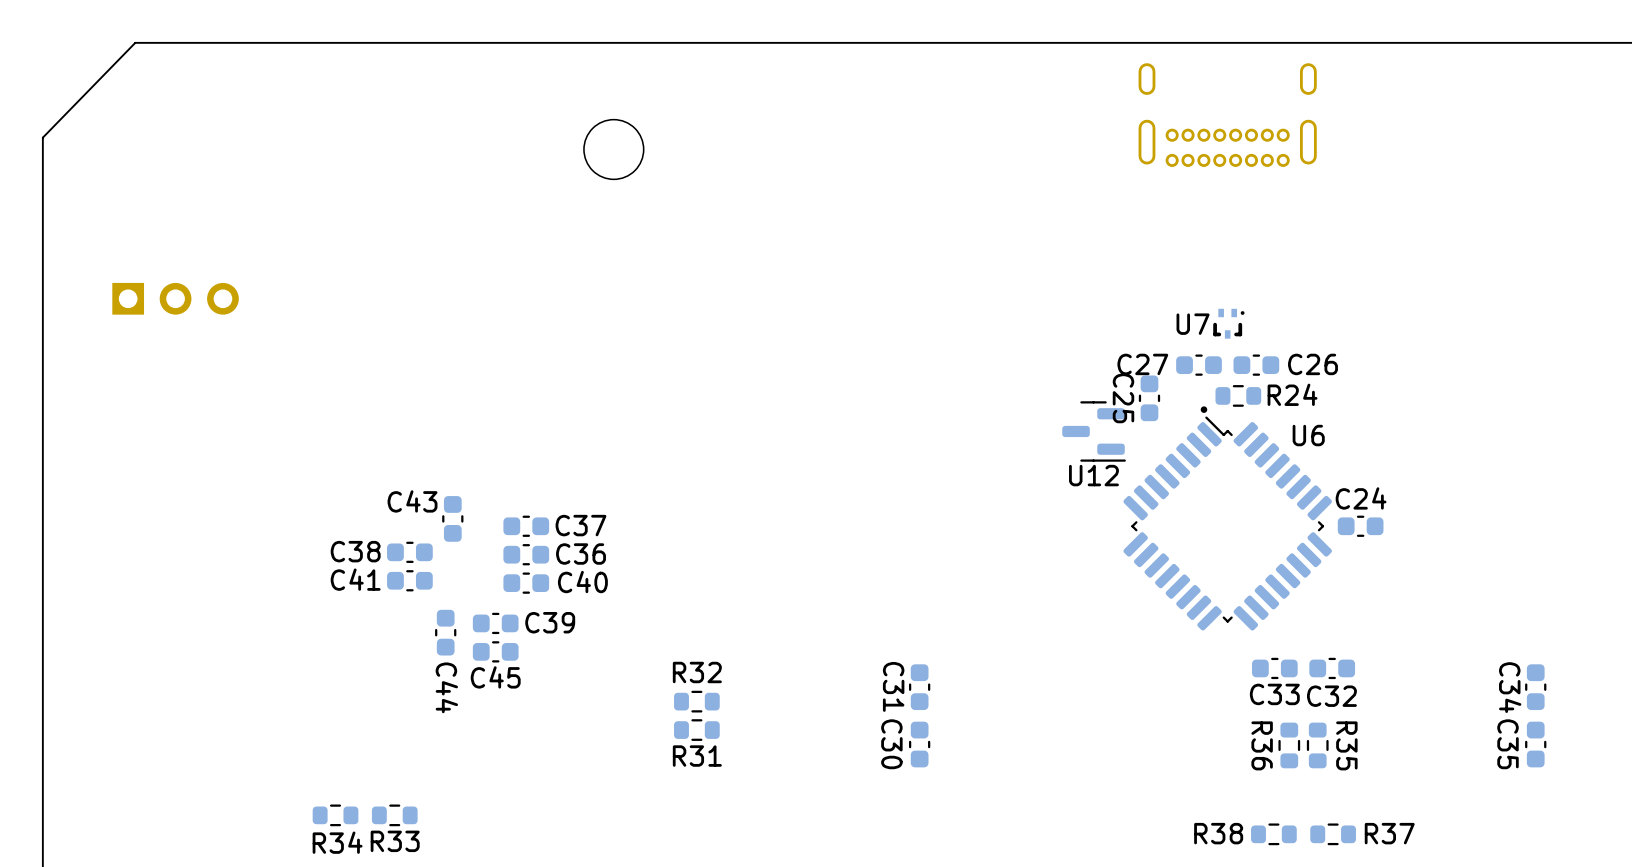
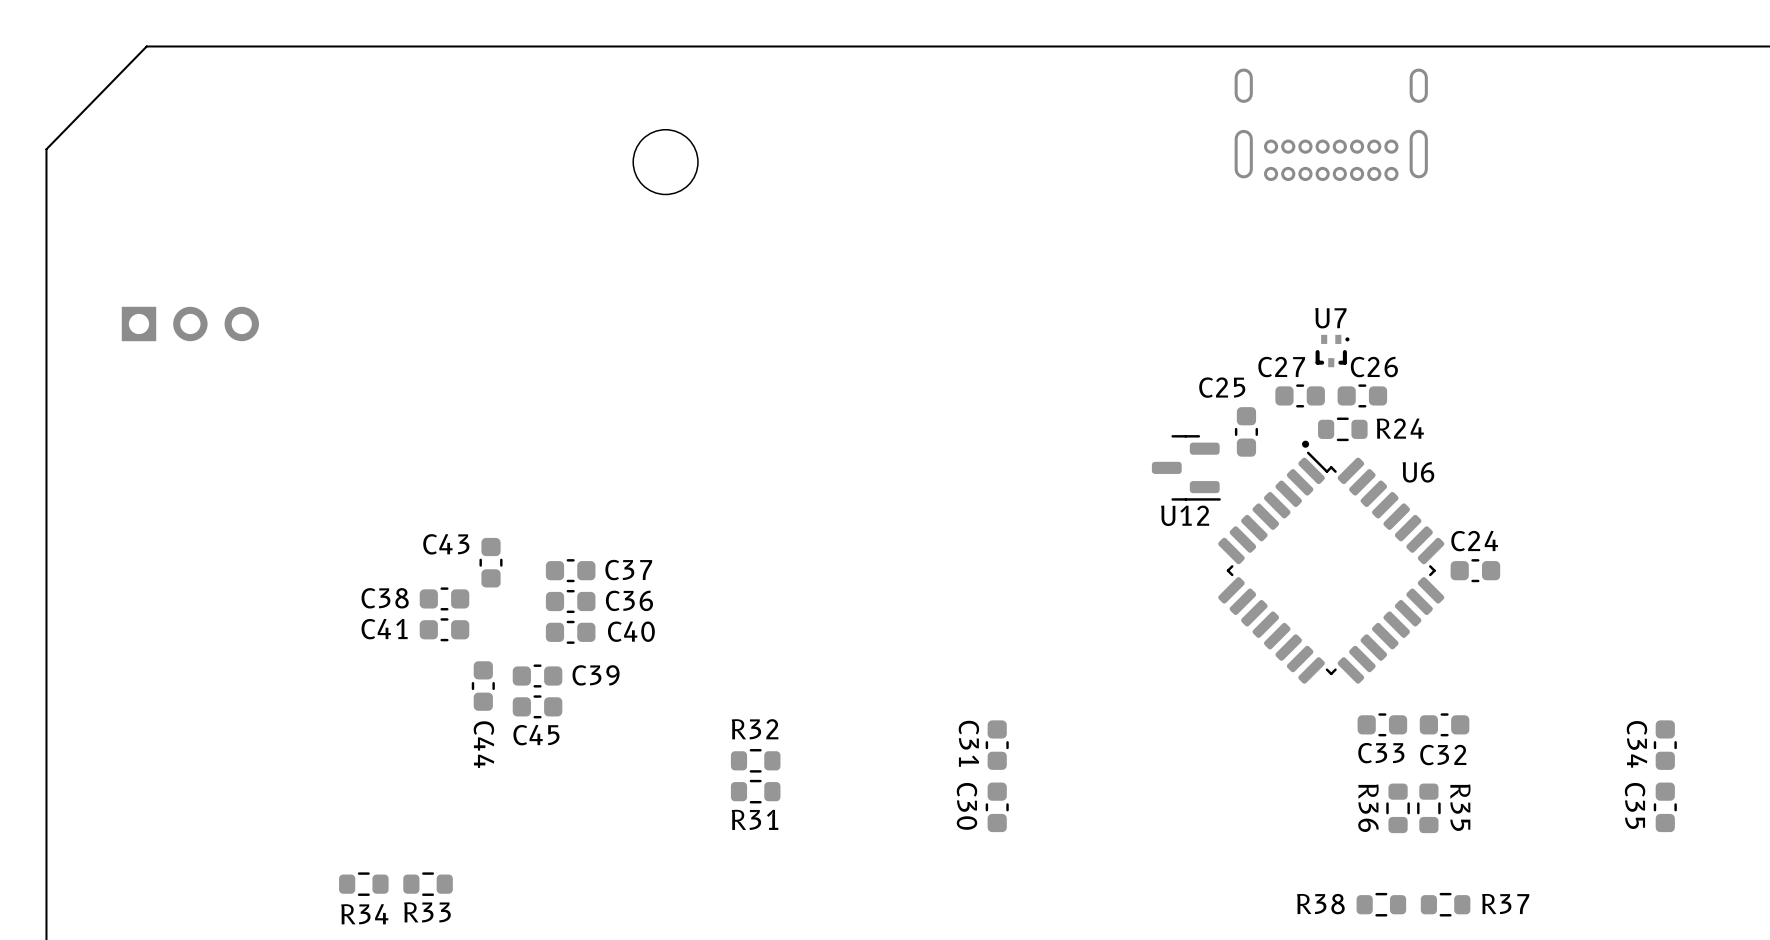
U7 name position: U7 (1193, 324) -> U7 (1330, 318)
C27 name position: C27 (1142, 364) -> C27 (1281, 367)
C26 name position: C26 (1312, 364) -> C26 (1374, 367)
C25 name rotation: 0° (1123, 398) -> 90° counterclockwise (1222, 387)

